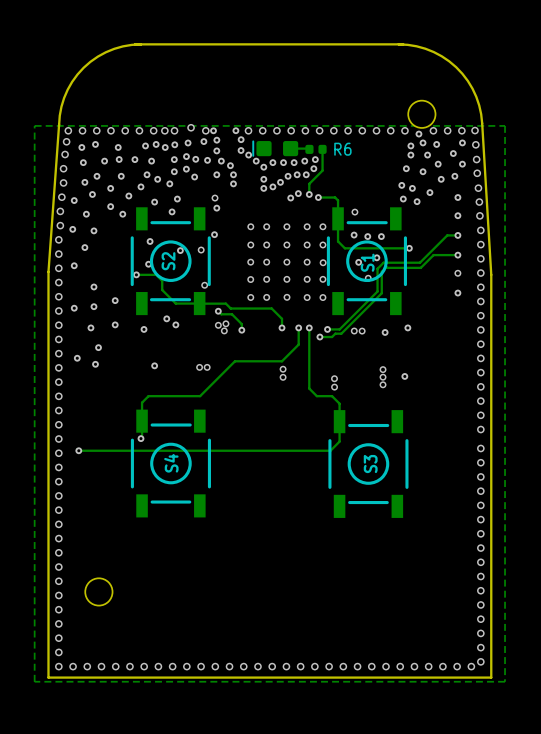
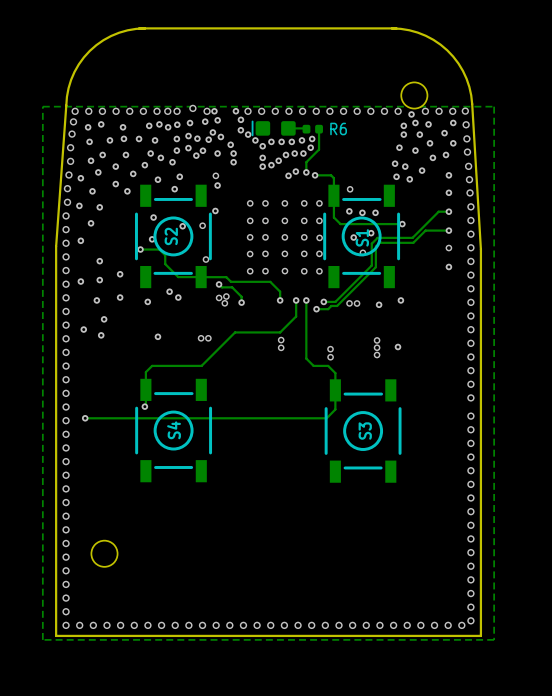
via: (216, 150) -> none
via: none -> (212, 132)
via: none -> (220, 136)
via: (221, 161) -> none
via: none -> (202, 150)

